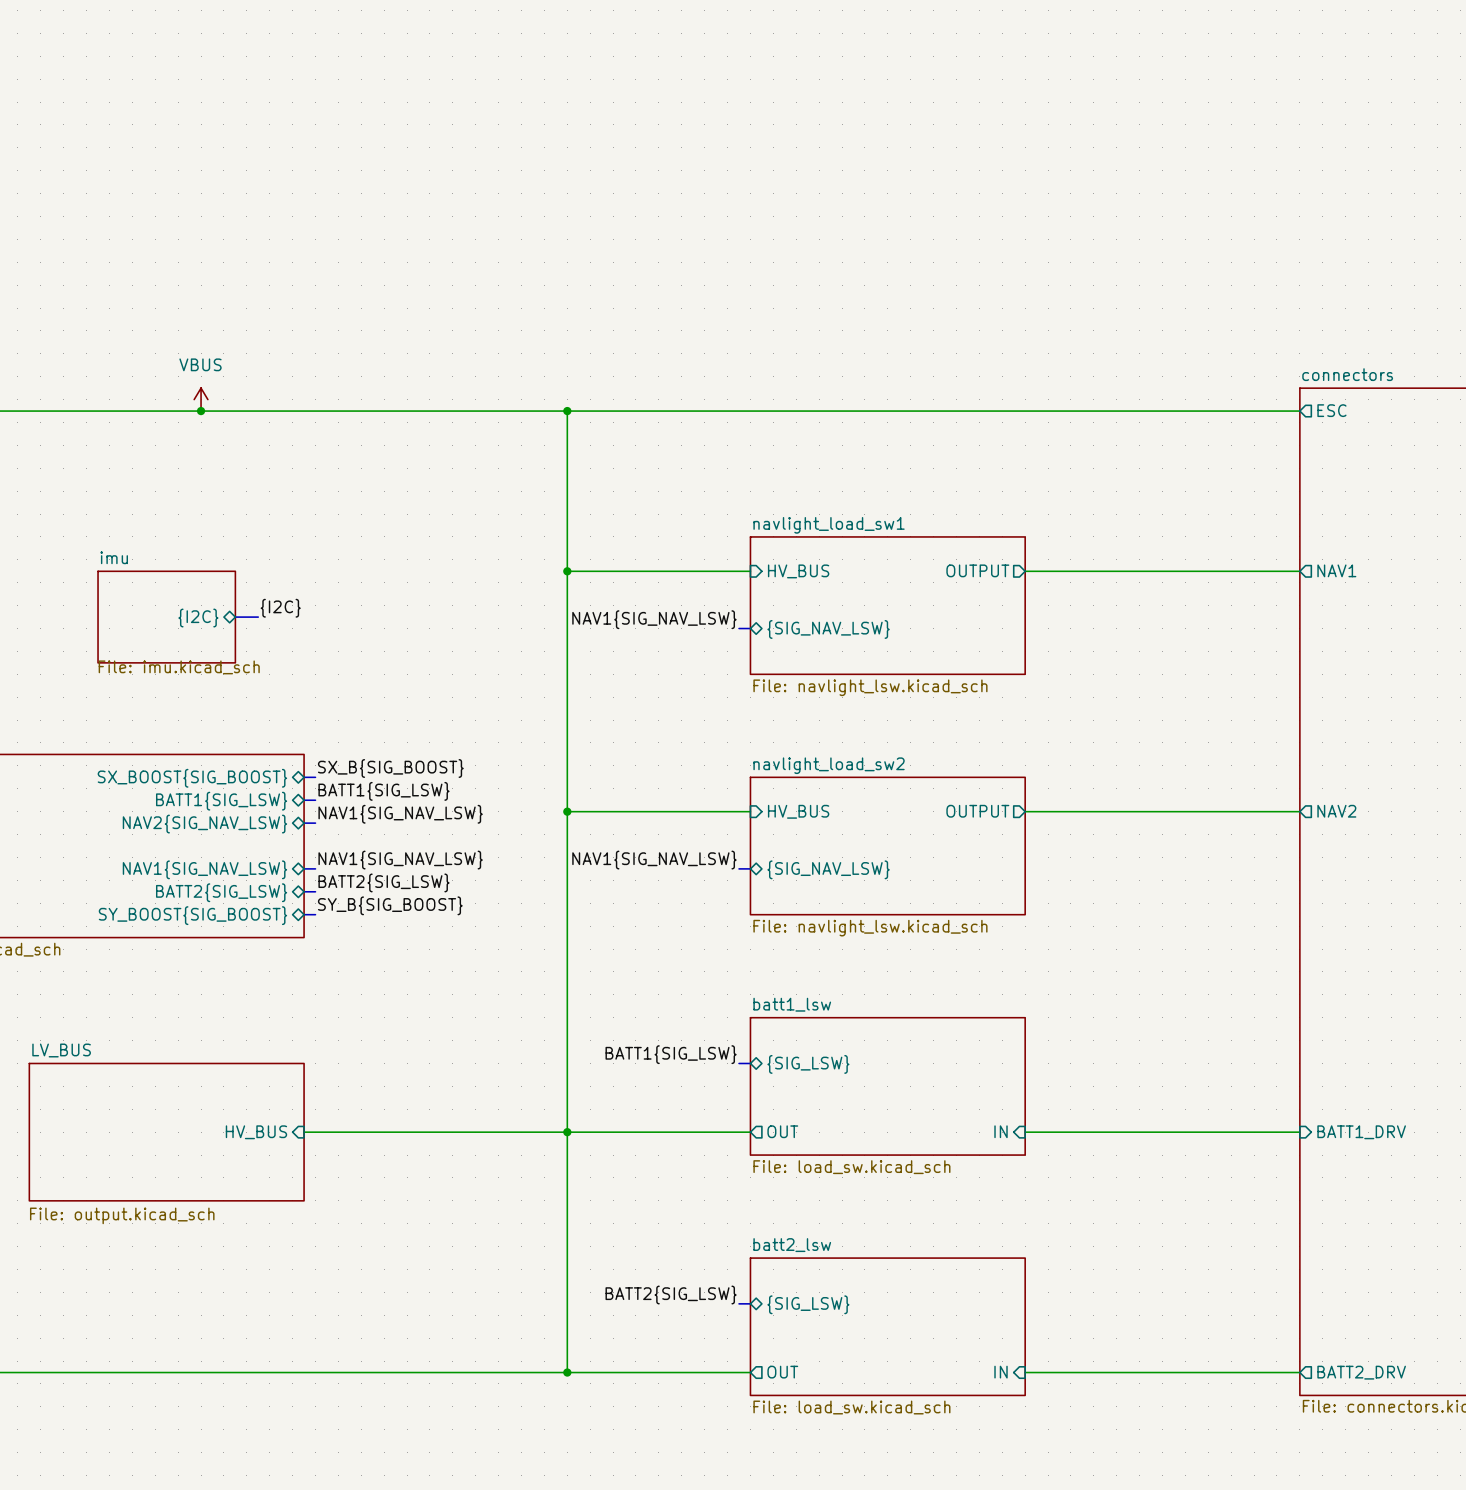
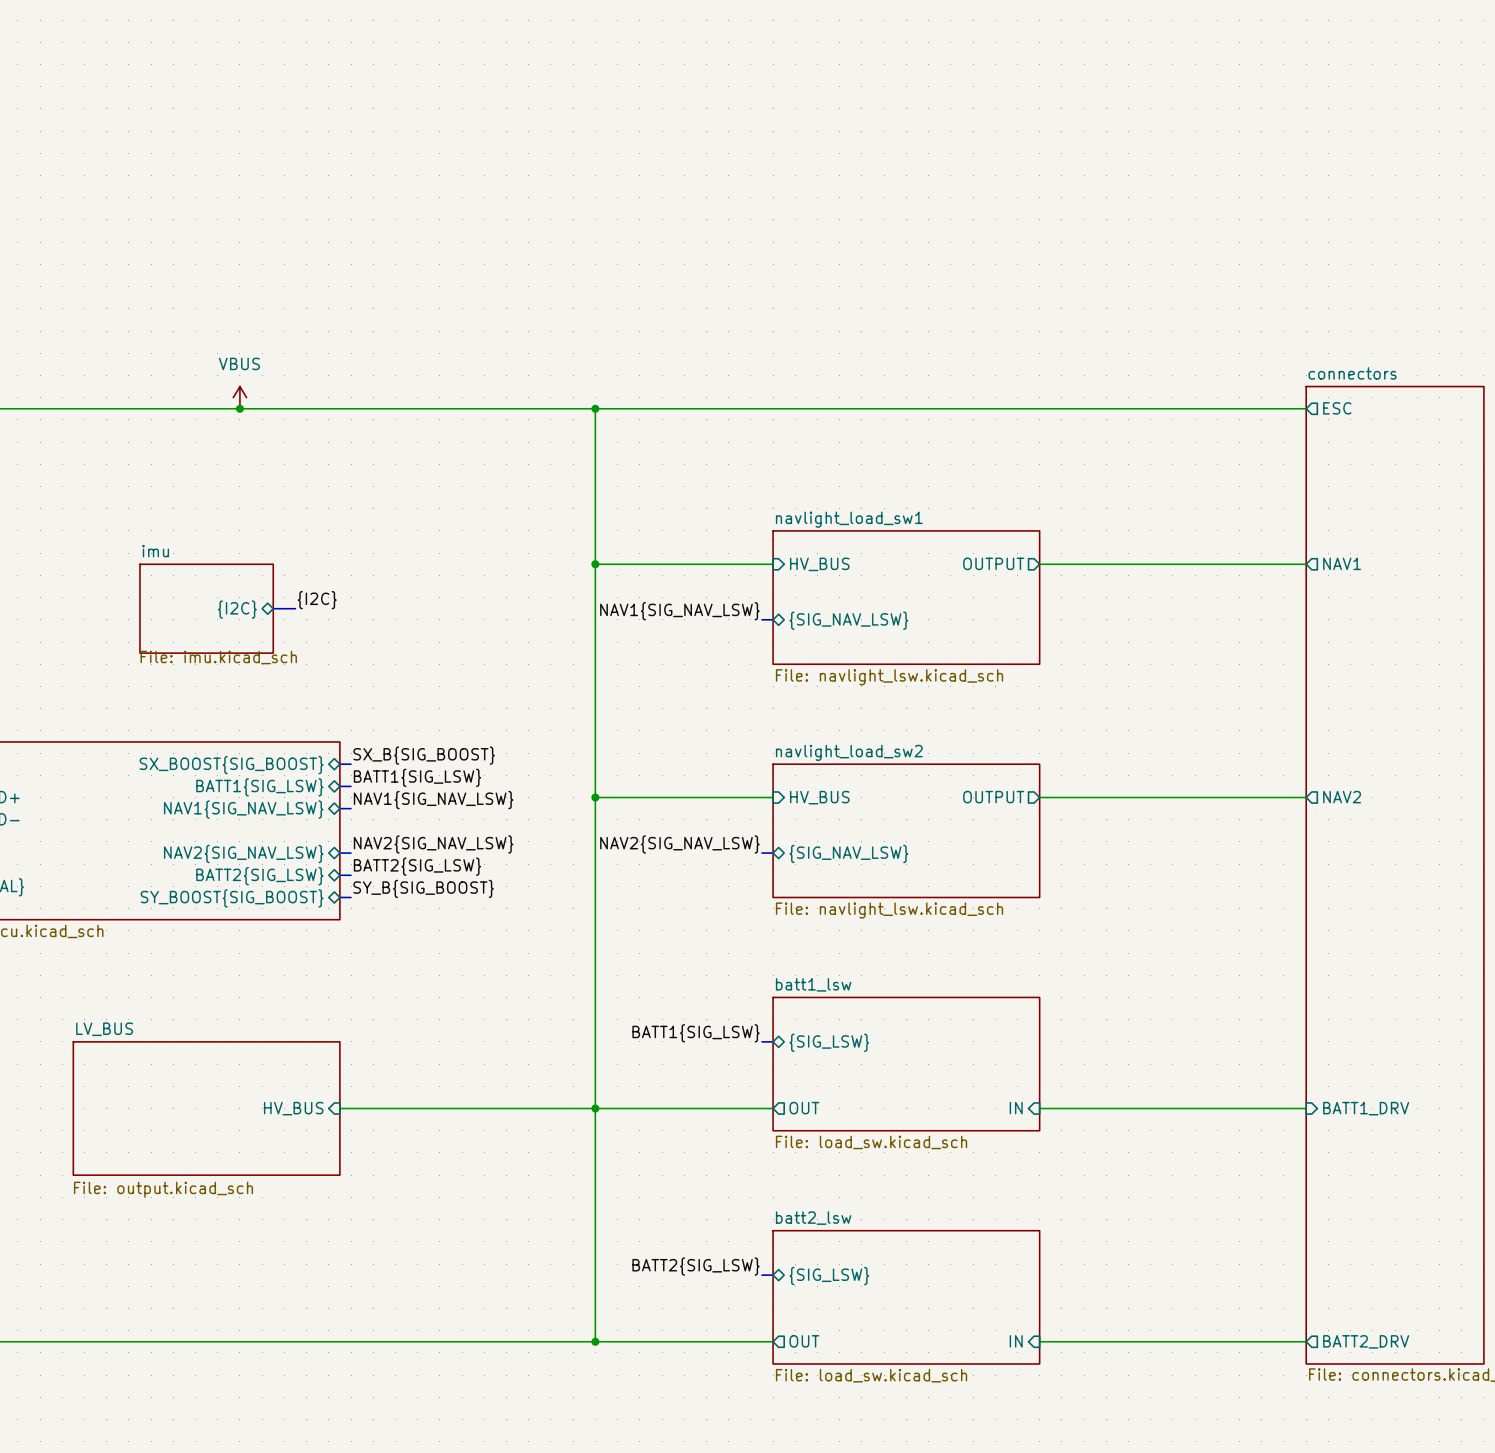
sheet pin: NAV2{SIG_NAV_LSW} (204, 824) -> NAV1{SIG_NAV_LSW} (243, 809)
label: NAV1{SIG_NAV_LSW} (400, 860) -> NAV2{SIG_NAV_LSW} (433, 844)
label: NAV1{SIG_NAV_LSW} (654, 860) -> NAV2{SIG_NAV_LSW} (679, 844)
sheet pin: NAV1{SIG_NAV_LSW} (204, 869) -> NAV2{SIG_NAV_LSW} (243, 853)

